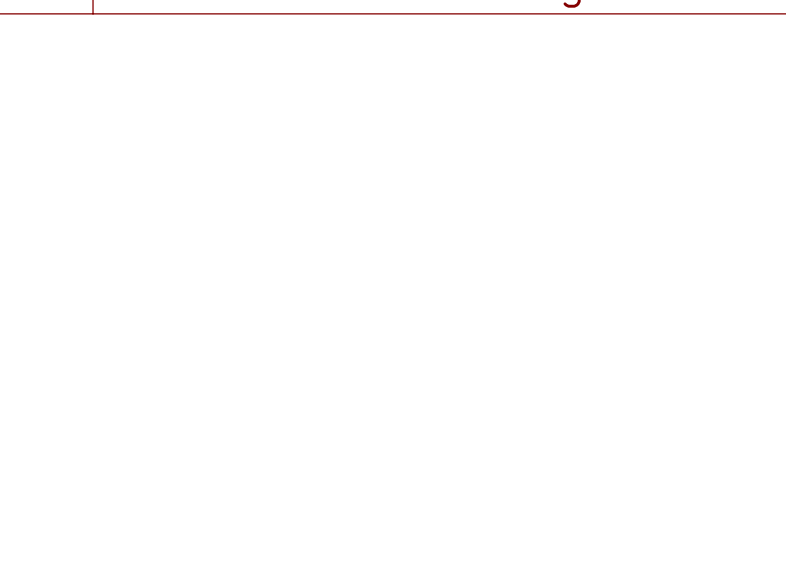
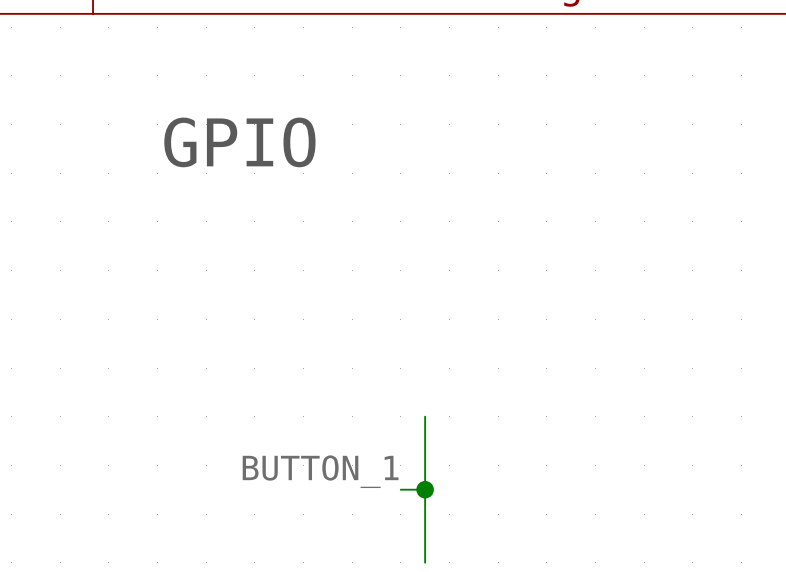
text: none -> GPIO (239, 142)
wire: none -> (425, 416) (425, 562)
label: none -> BUTTON_1 (320, 471)
wire: none -> (400, 489) (425, 489)
junction: none -> (425, 489)

